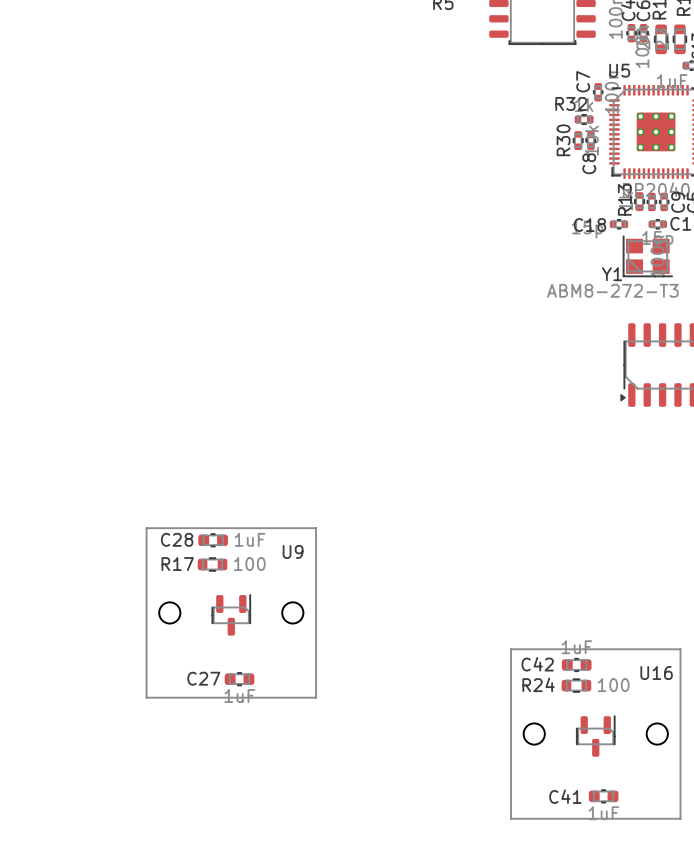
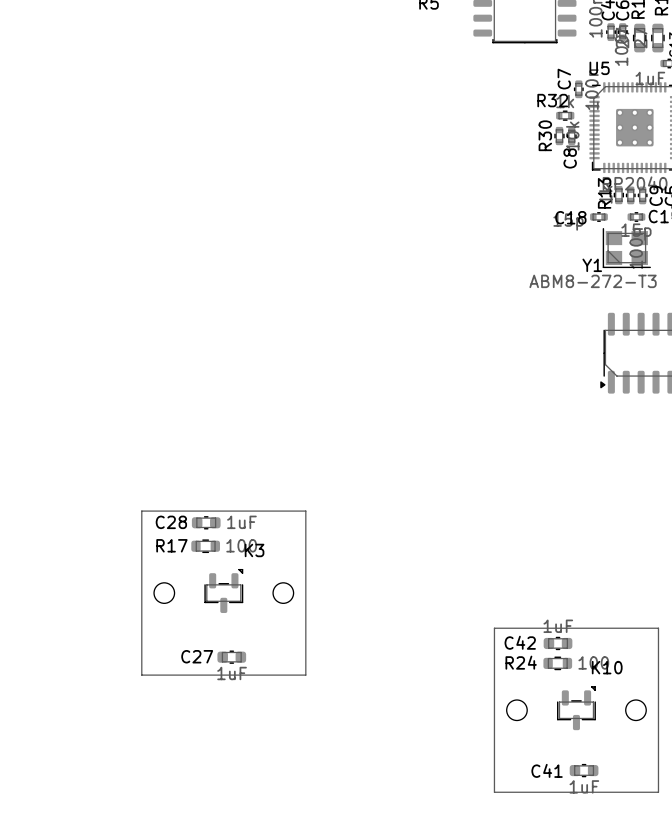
U9: (231, 612) -> none
K3: none -> (223, 593)
U16: (595, 734) -> none
K10: none -> (576, 710)

